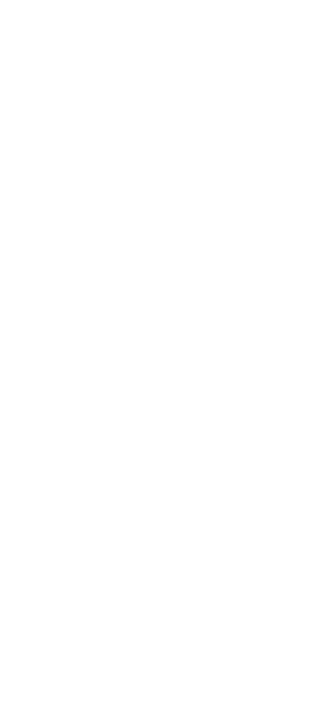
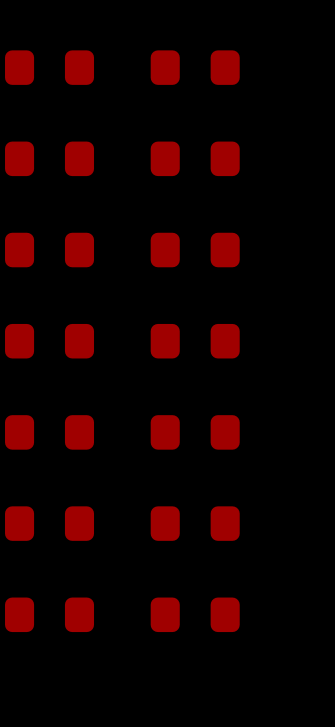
part: none -> (49, 67)
part: none -> (195, 67)
part: none -> (49, 158)
part: none -> (195, 158)
part: none -> (49, 250)
part: none -> (195, 250)
part: none -> (49, 341)
part: none -> (195, 341)
part: none -> (49, 432)
part: none -> (195, 432)
part: none -> (49, 523)
part: none -> (195, 523)
part: none -> (49, 614)
part: none -> (195, 614)

